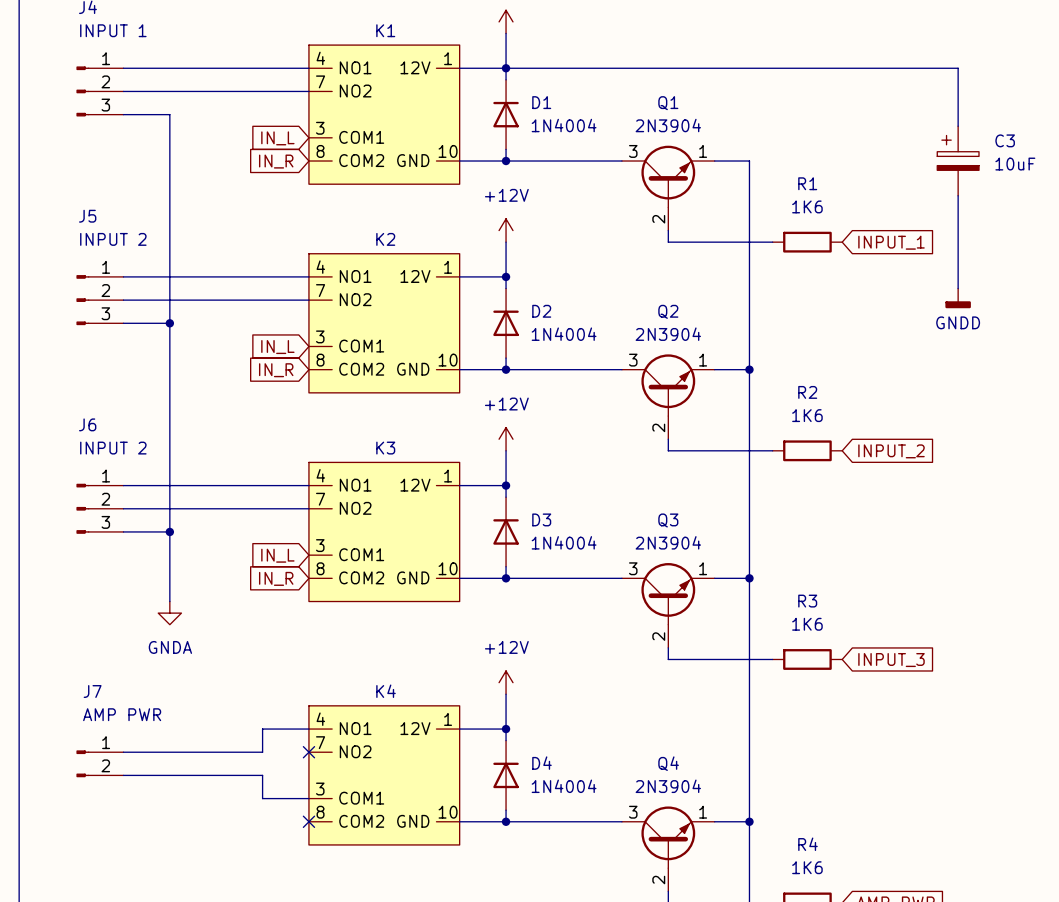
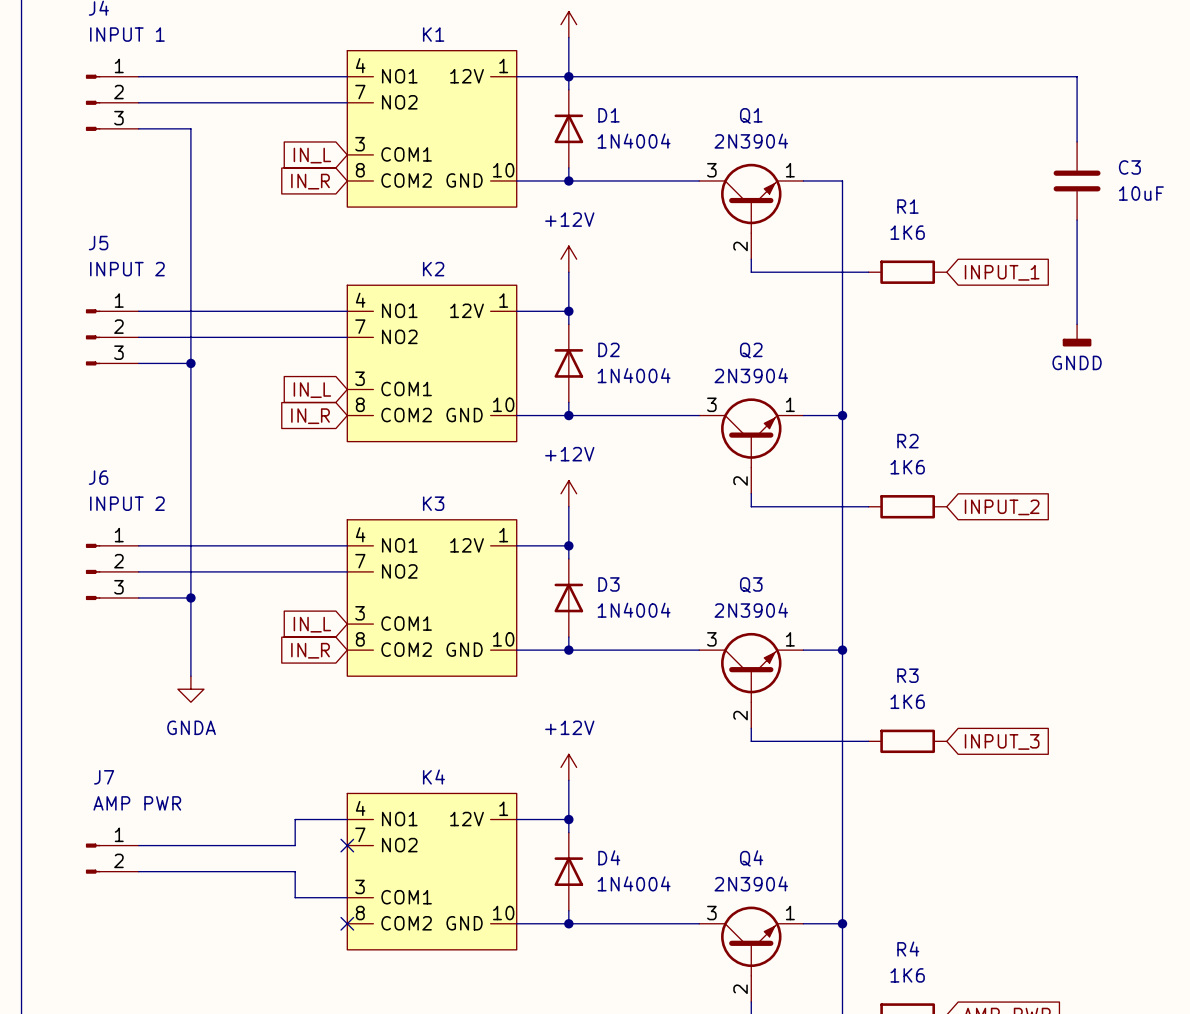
C3 symbol: [937, 126, 980, 196] -> [1053, 141, 1101, 221]

